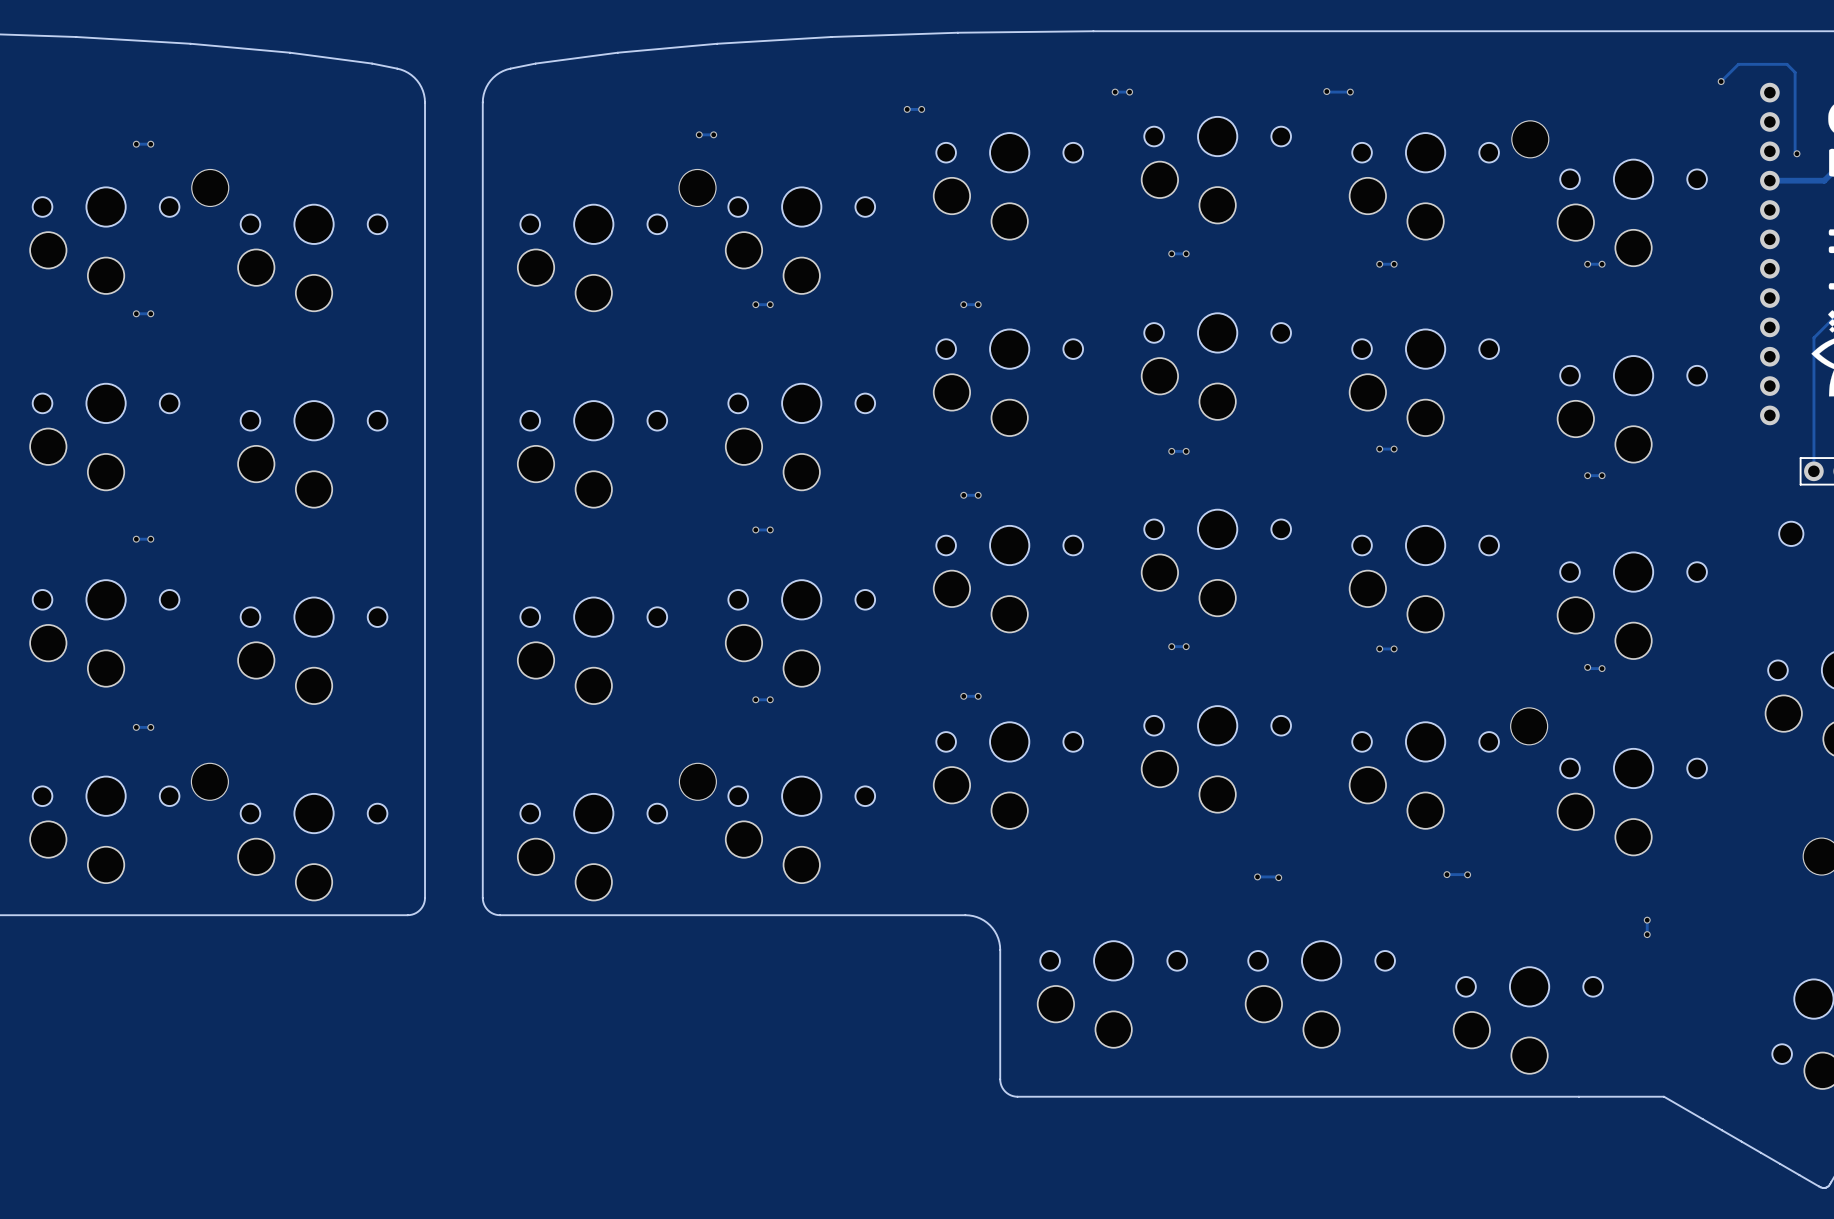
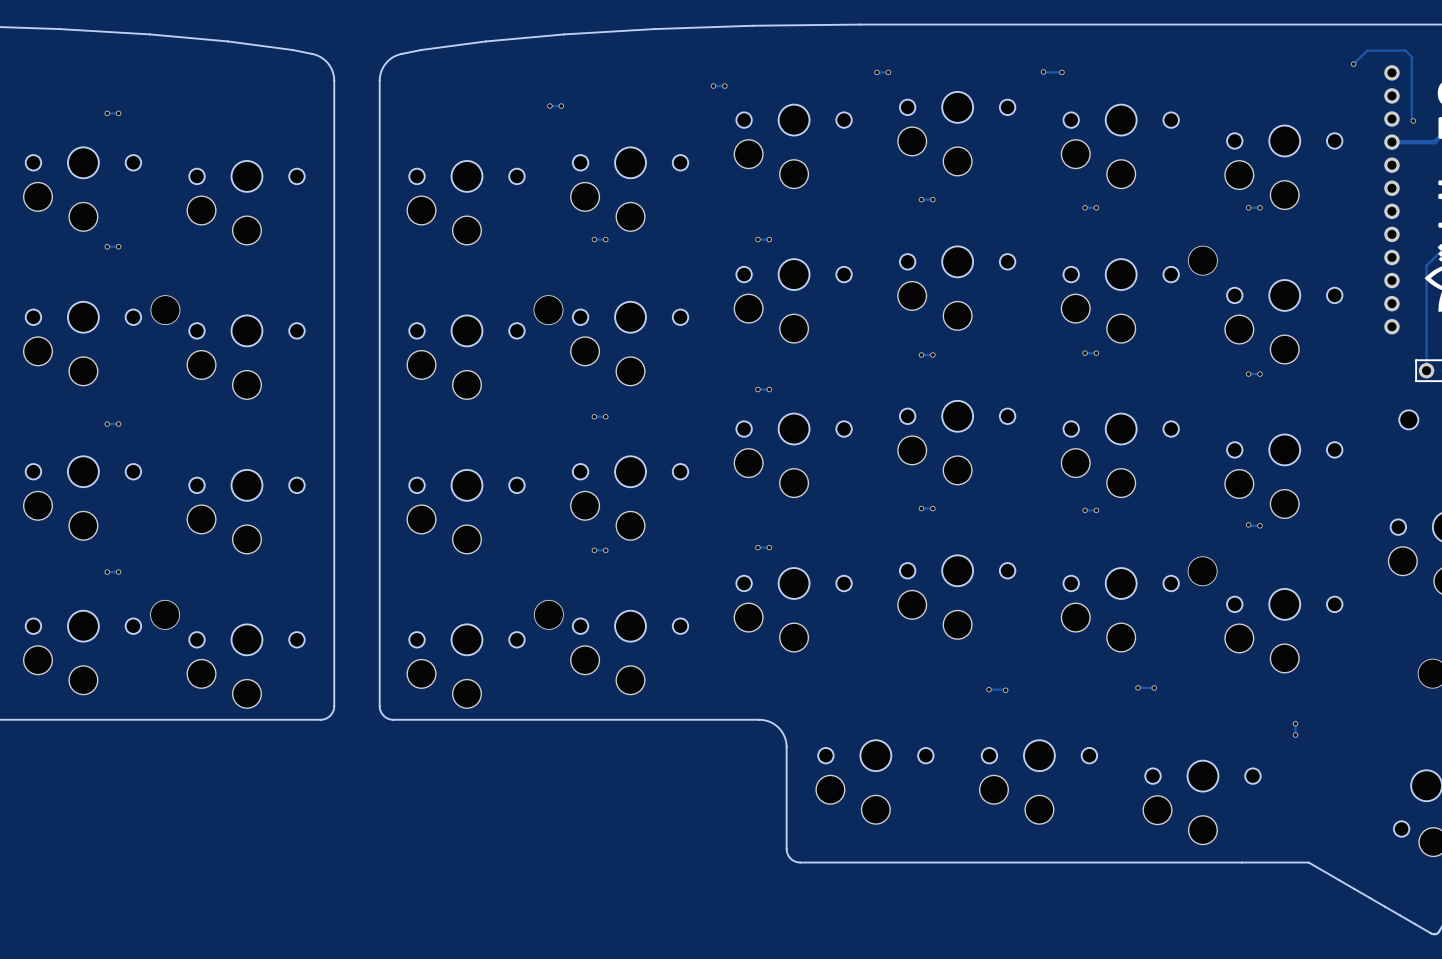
part position: (1530, 139) -> (1202, 260)
part position: (210, 187) -> (165, 310)
part position: (697, 187) -> (548, 310)

